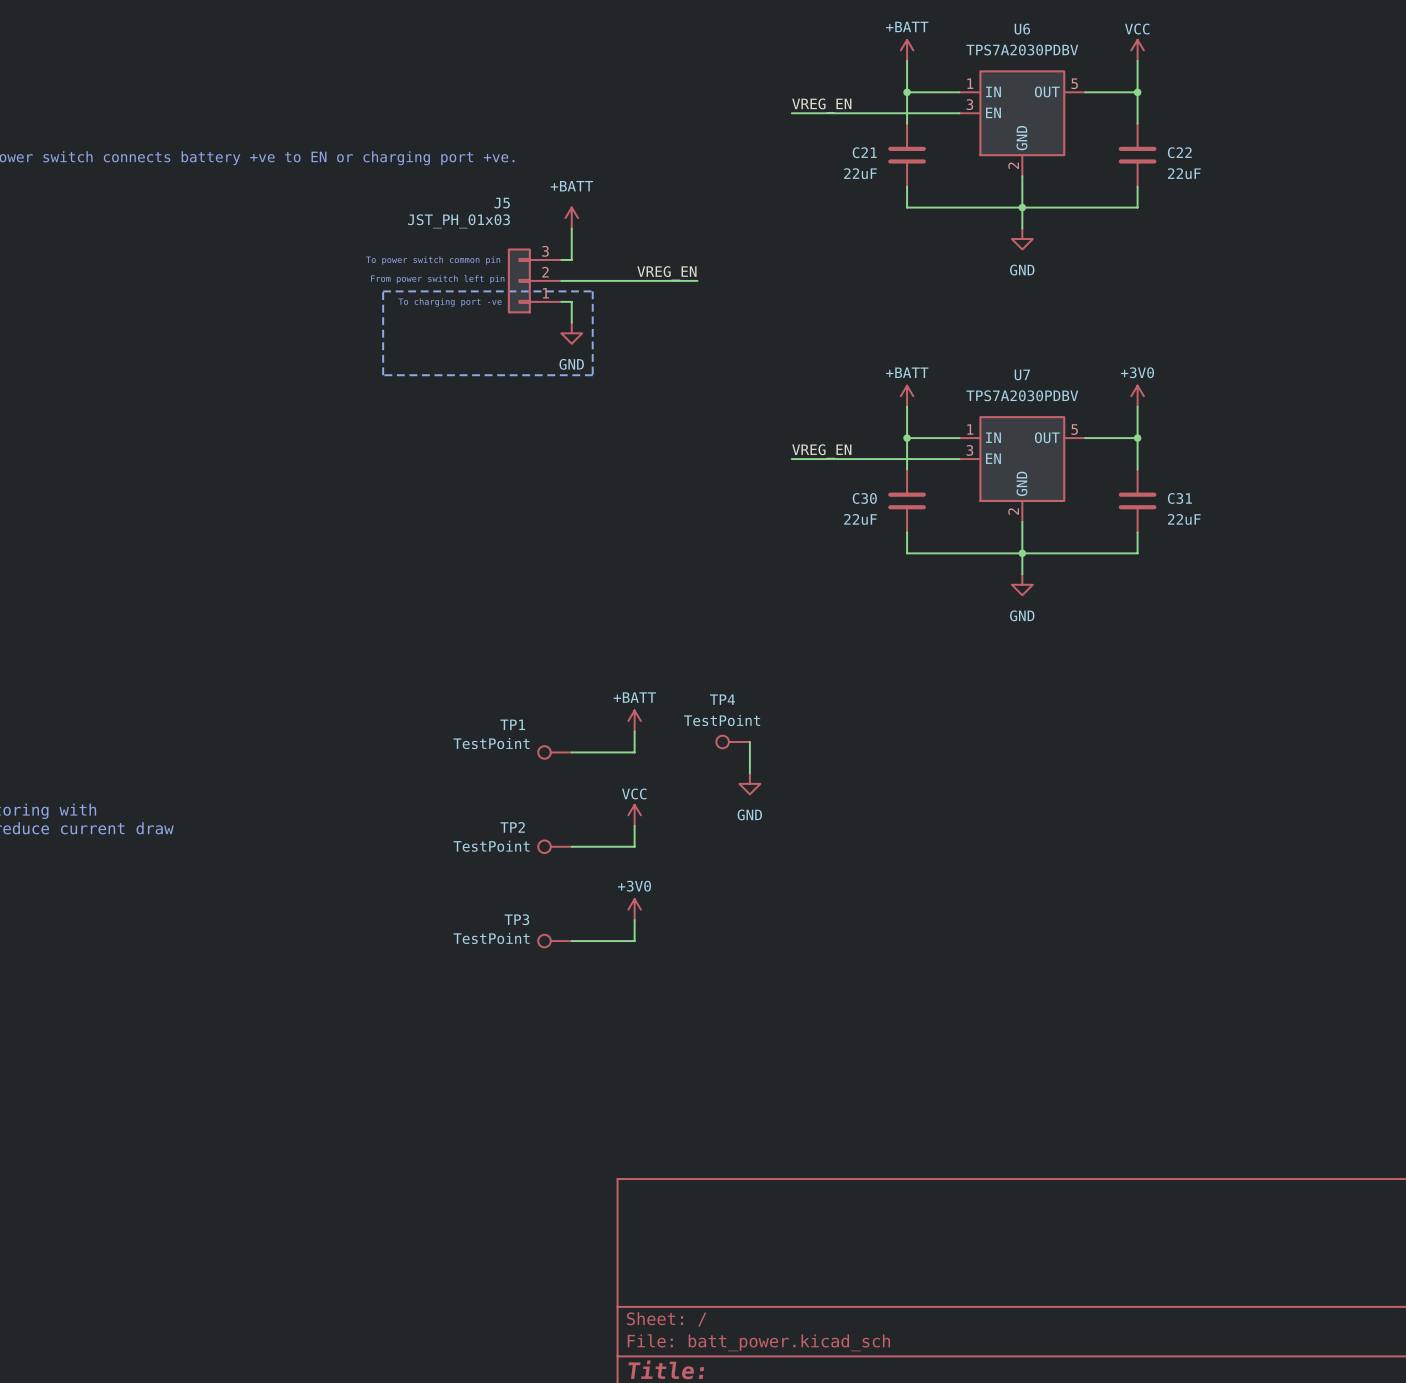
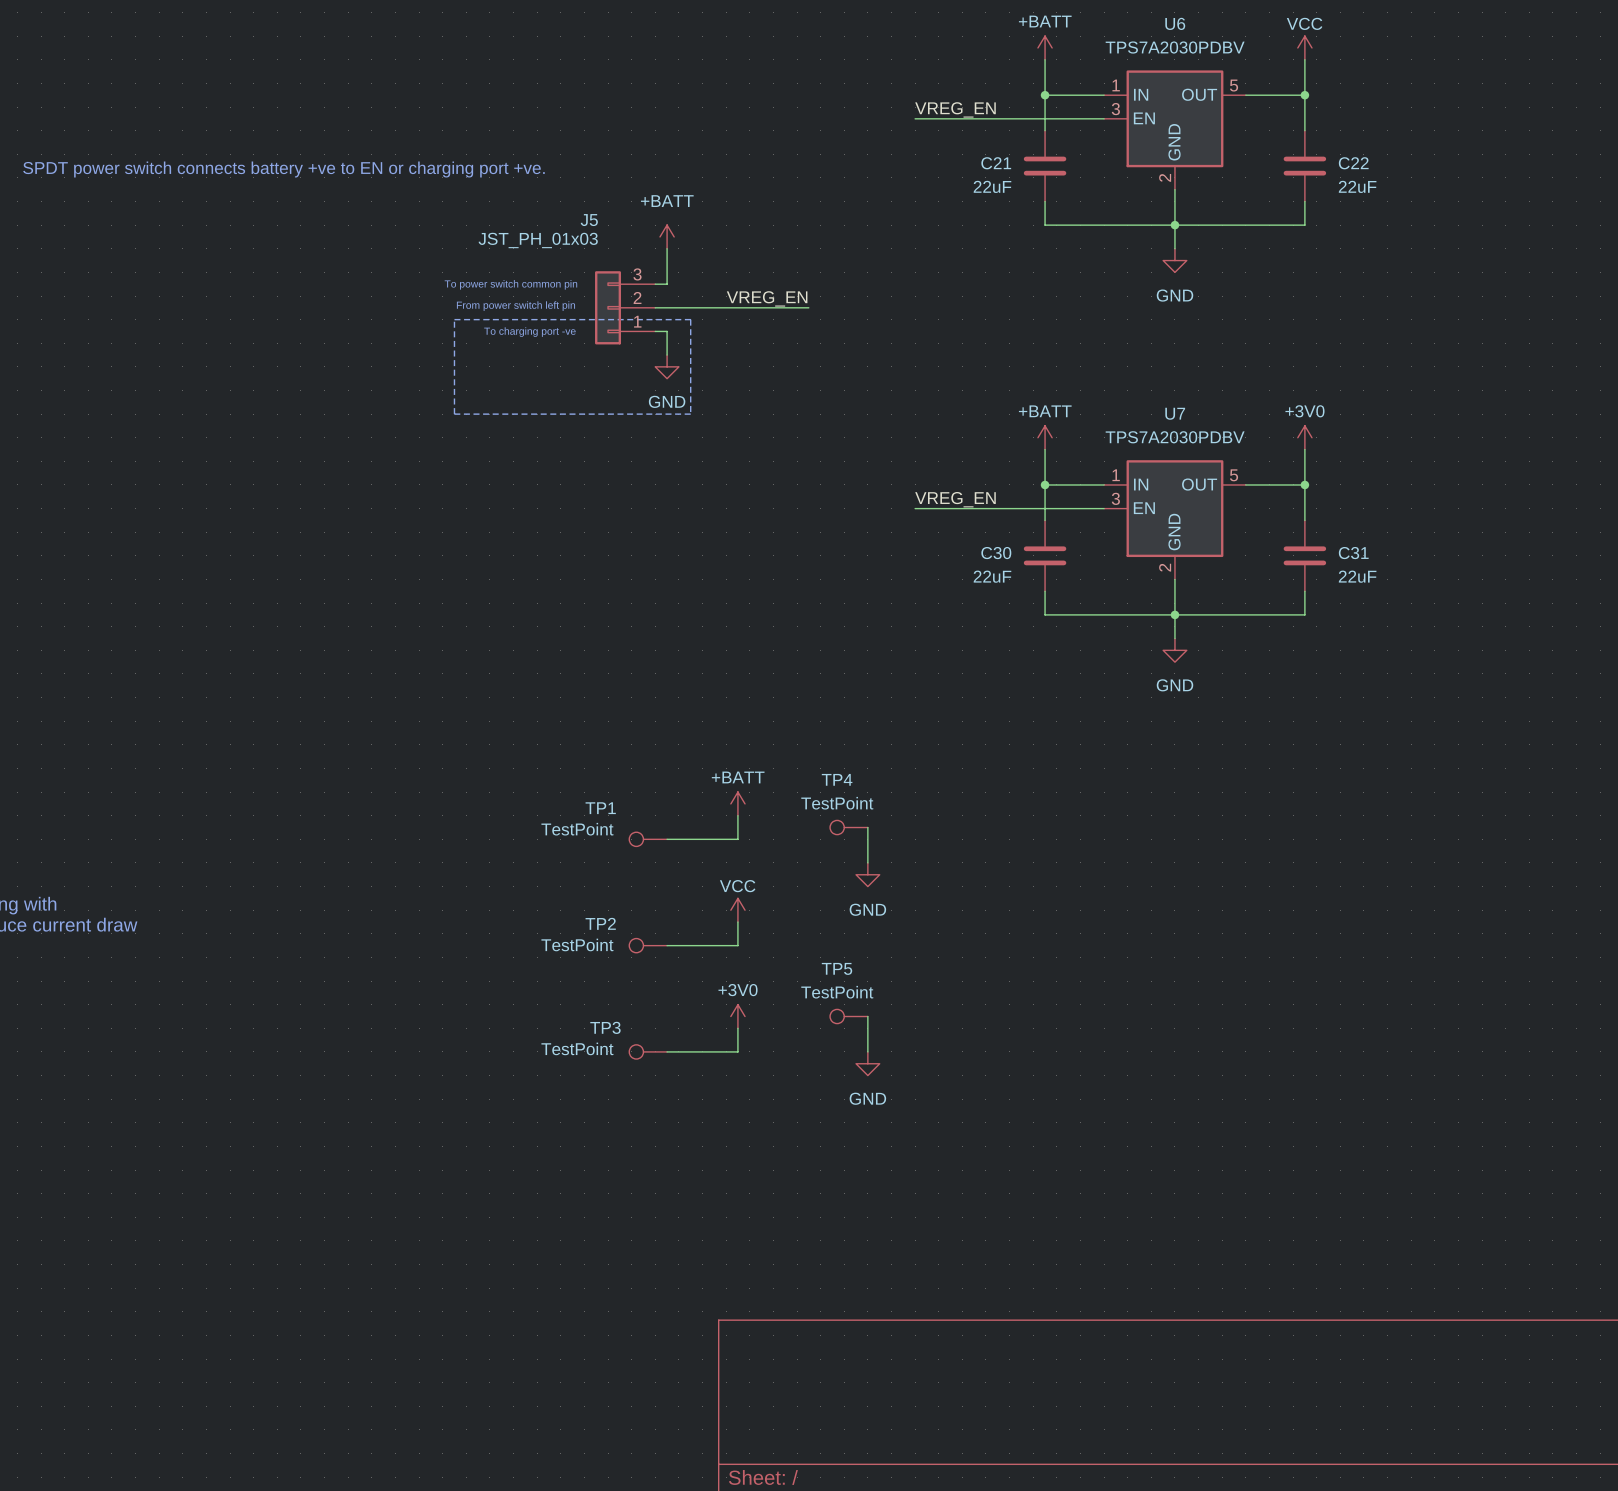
TP5: none -> TestPoint (848, 1016)
wire: none -> (867, 1016) (867, 1051)
power symbol: none -> GND (867, 1063)

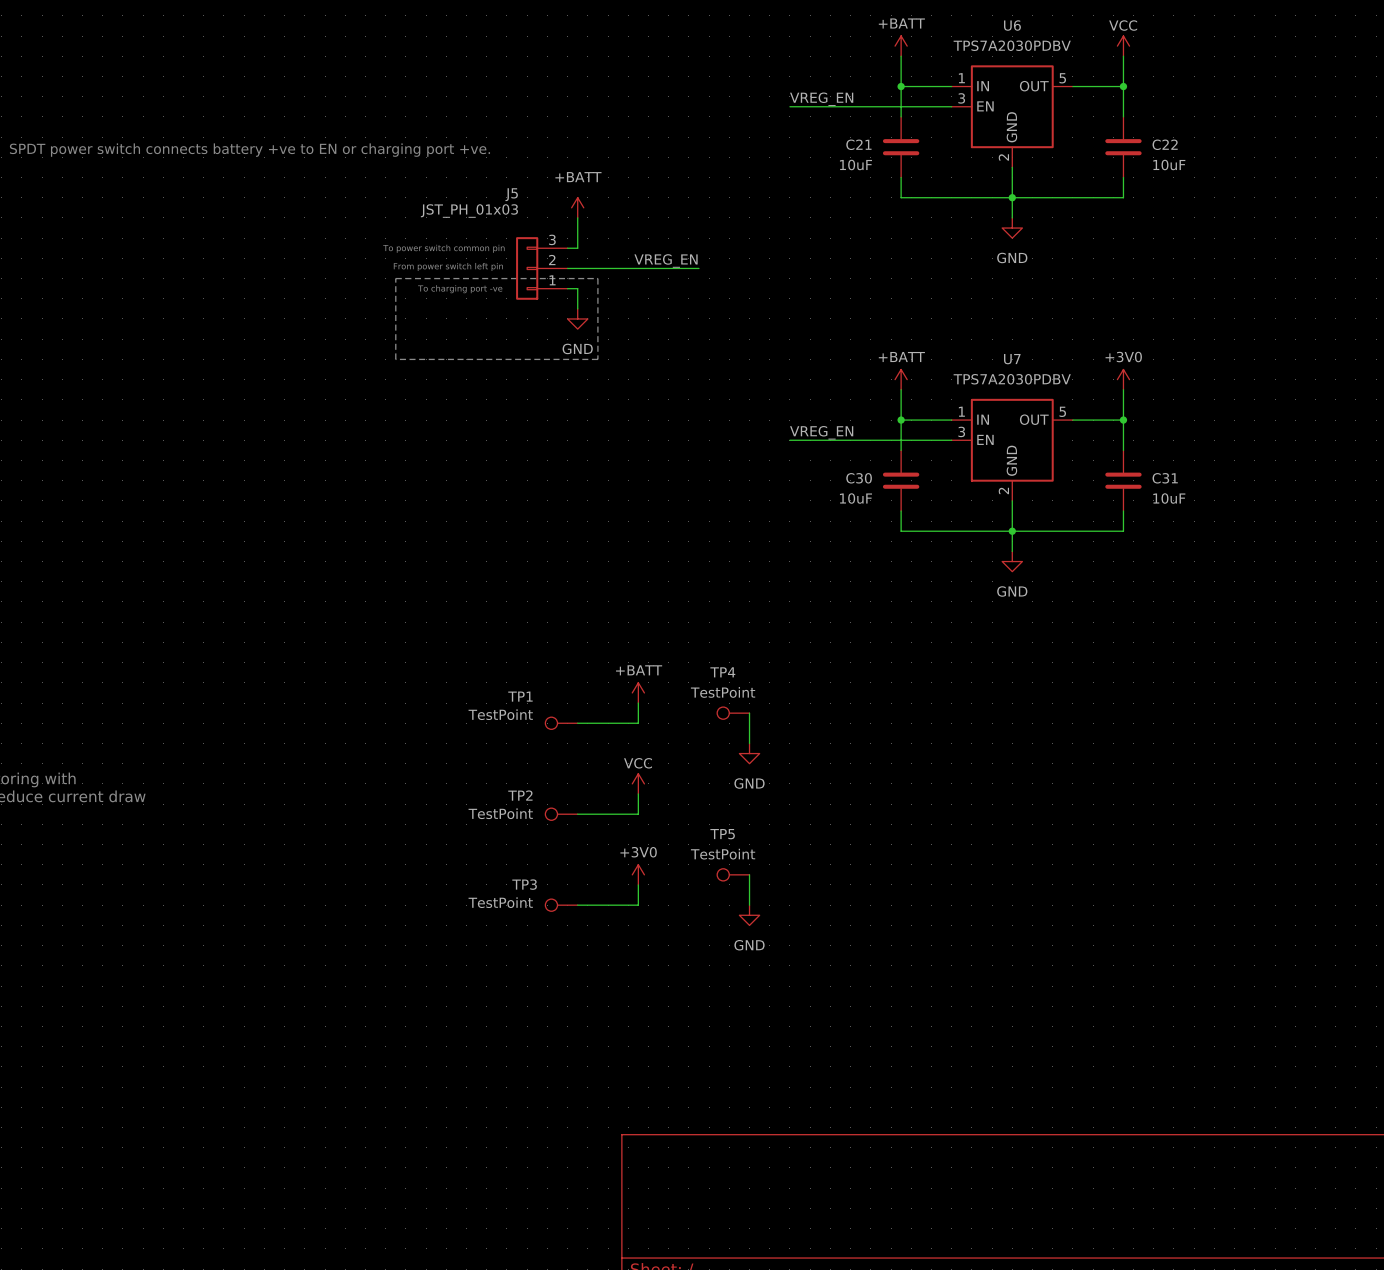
C21 value: 22uF (992, 186) -> 10uF (855, 165)
C22 value: 22uF (1357, 186) -> 10uF (1169, 165)
C30 value: 22uF (992, 576) -> 10uF (855, 498)
C31 value: 22uF (1357, 576) -> 10uF (1169, 498)

